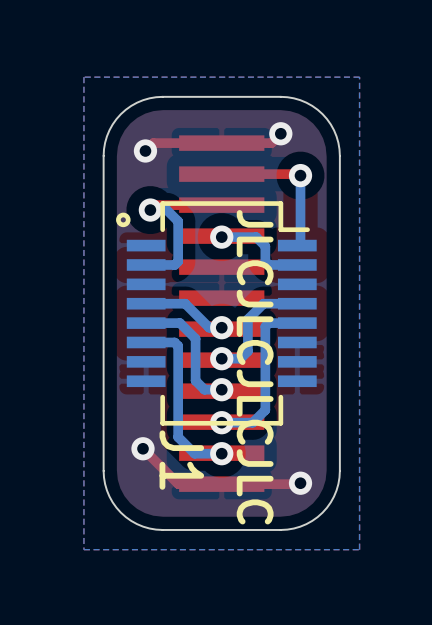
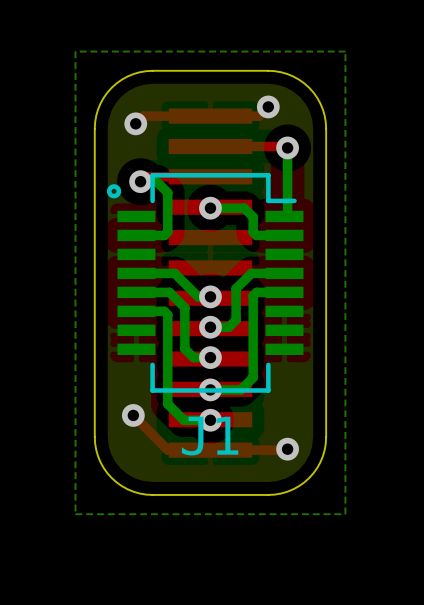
text: JLCJLCJLCJLC (255, 367) -> none
J1 name rotation: 0° (181, 460) -> 90° counterclockwise (210, 436)

